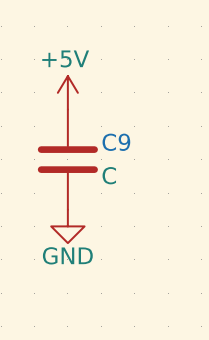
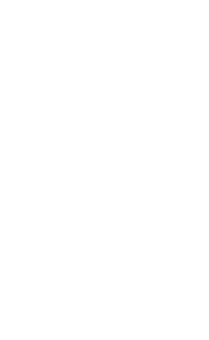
power symbol: +5V (67, 92) -> none
C9: C (67, 159) -> none
power symbol: GND (67, 226) -> none

